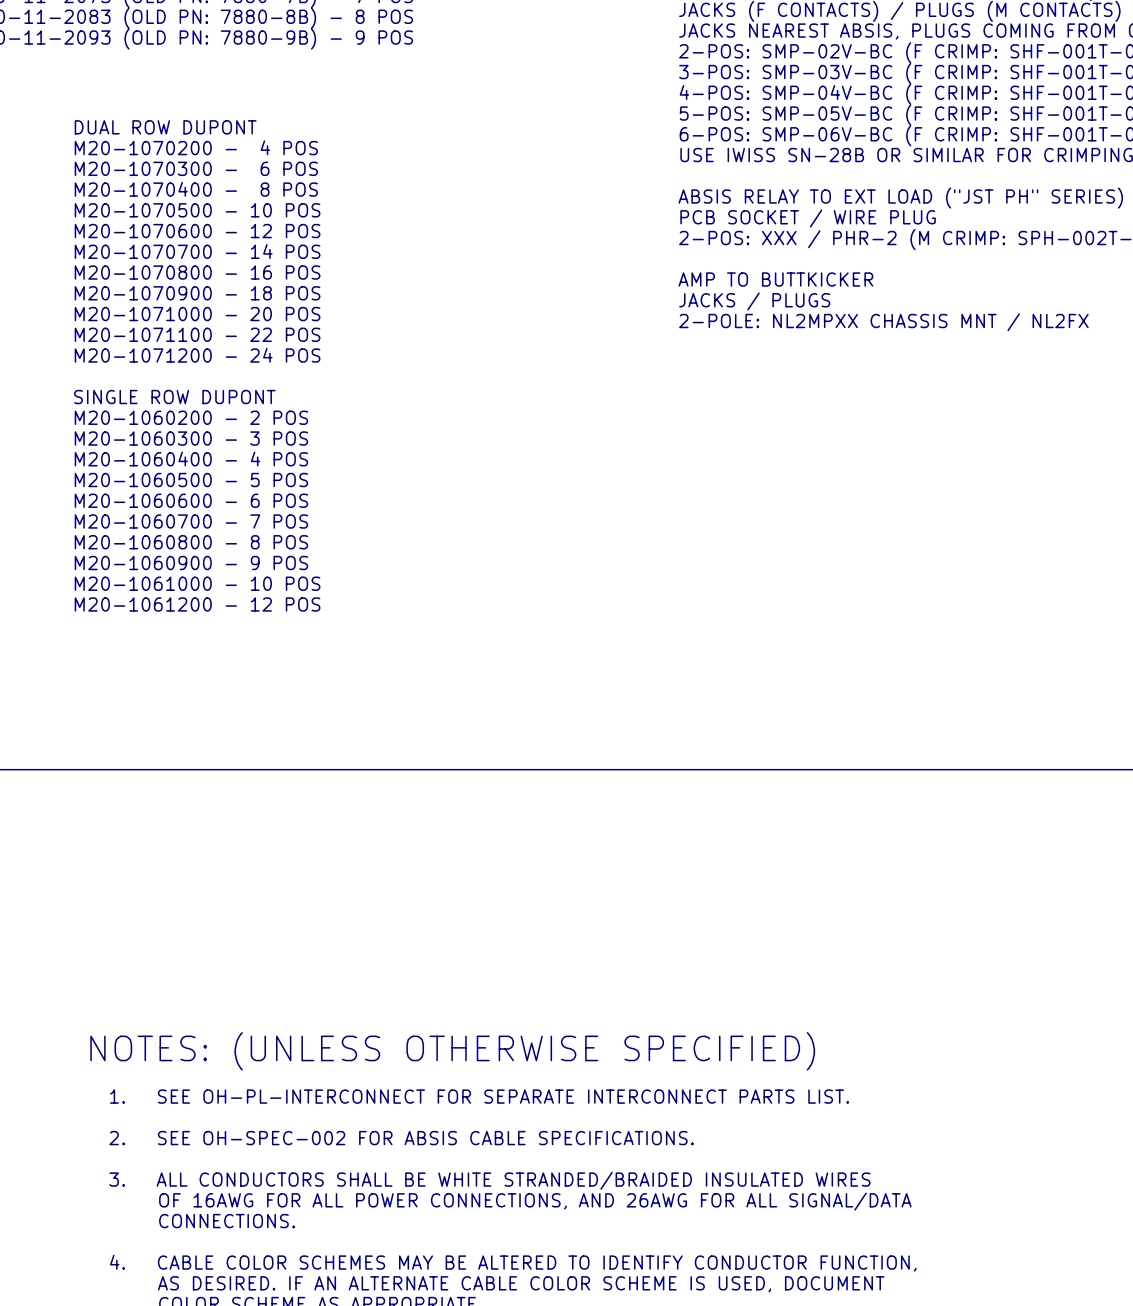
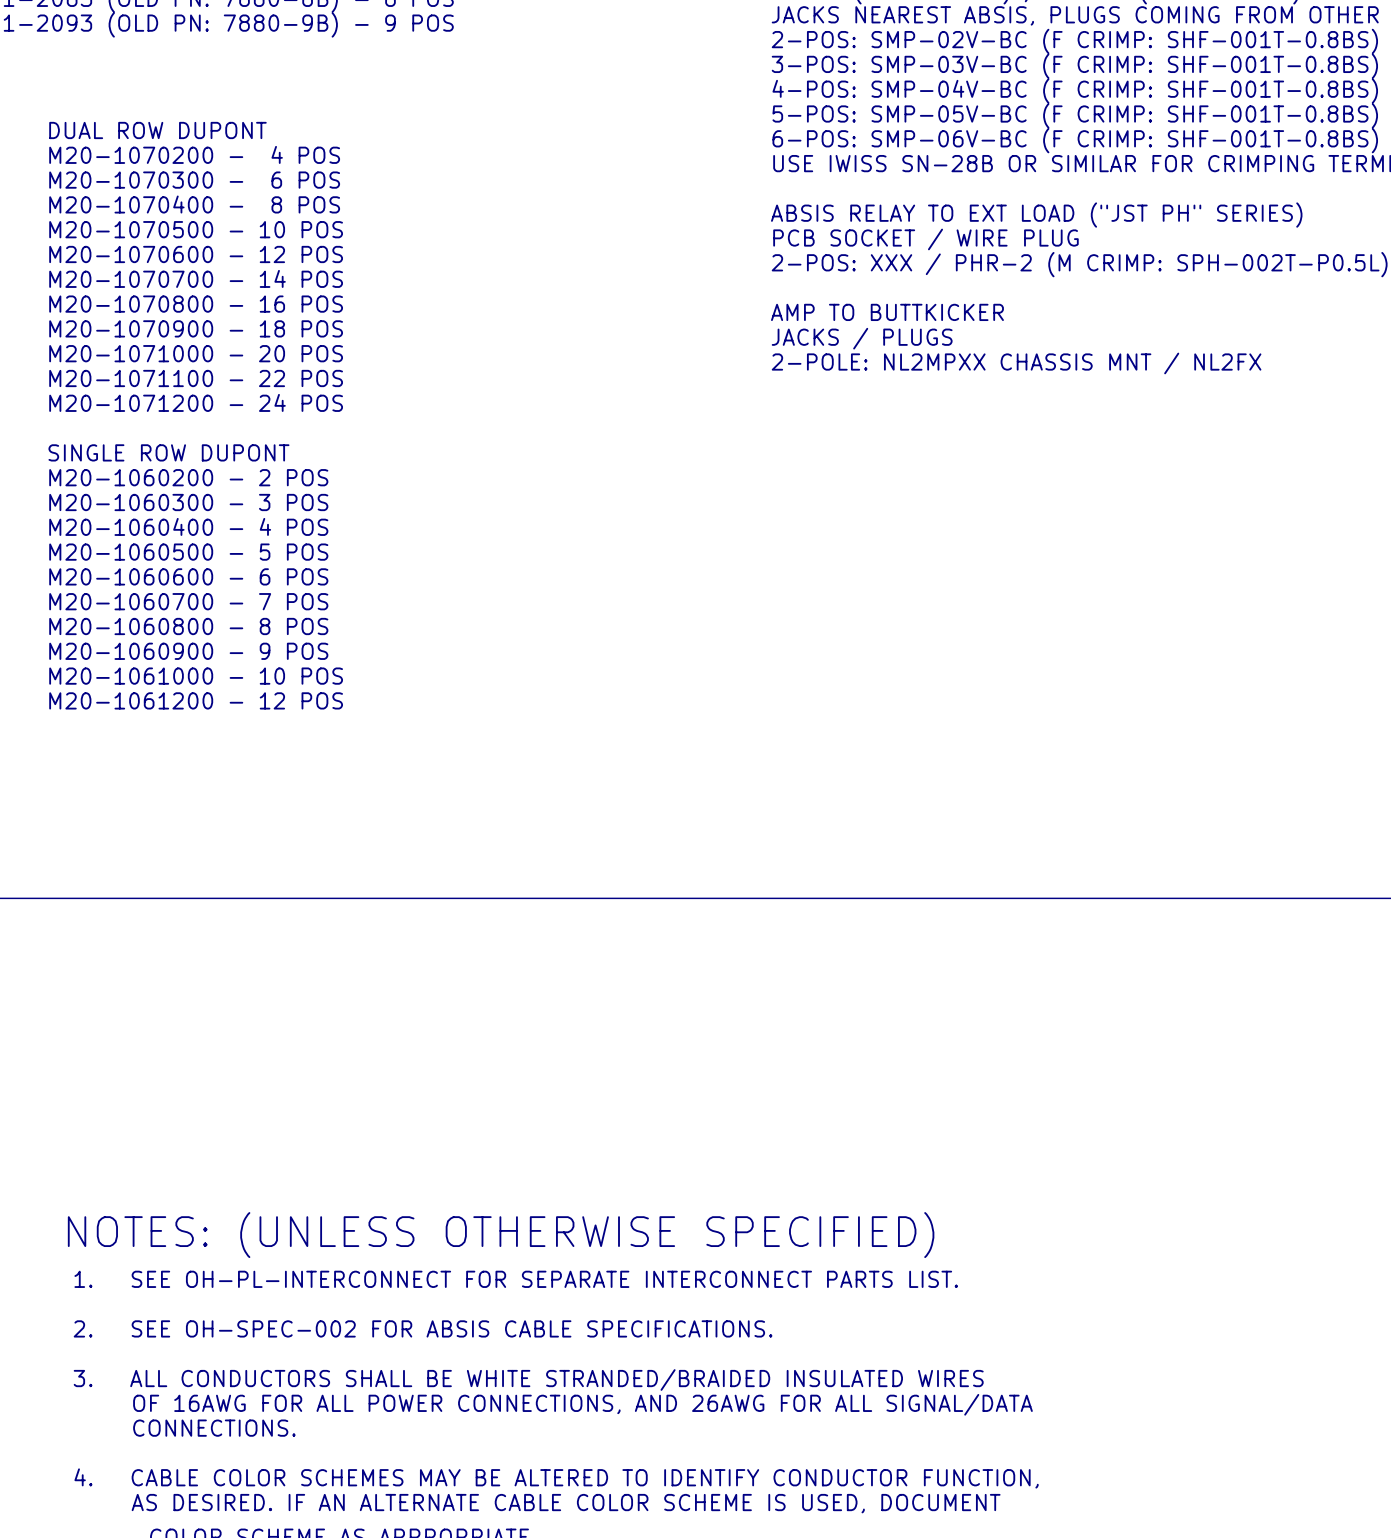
text position: 1. SEE OH-PL-INTERCONNECT FOR SEPARATE INTERCONNECT PARTS LIST. (479, 1096) -> 1. SEE OH-PL-INTERCONNECT FOR SEPARATE INTERCONNECT PARTS LIST. (516, 1279)
text position: 2. SEE OH-SPEC-002 FOR ABSIS CABLE SPECIFICATIONS. (401, 1138) -> 2. SEE OH-SPEC-002 FOR ABSIS CABLE SPECIFICATIONS. (423, 1328)
text position: 3. ALL CONDUCTORS SHALL BE WHITE STRANDED/BRAIDED INSULATED WIRES (489, 1180) -> 3. ALL CONDUCTORS SHALL BE WHITE STRANDED/BRAIDED INSULATED WIRES (528, 1379)
text position: OF 16AWG FOR ALL POWER CONNECTIONS, AND 26AWG FOR ALL SIGNAL/DATA (535, 1201) -> OF 16AWG FOR ALL POWER CONNECTIONS, AND 26AWG FOR ALL SIGNAL/DATA (582, 1404)
text position: CONNECTIONS. (227, 1221) -> CONNECTIONS. (214, 1428)
text position: 4. CABLE COLOR SCHEMES MAY BE ALTERED TO IDENTIFY CONDUCTOR FUNCTION, (513, 1263) -> 4. CABLE COLOR SCHEMES MAY BE ALTERED TO IDENTIFY CONDUCTOR FUNCTION, (556, 1478)
text position: AS DESIRED. IF AN ALTERNATE CABLE COLOR SCHEME IS USED, DOCUMENT (521, 1284) -> AS DESIRED. IF AN ALTERNATE CABLE COLOR SCHEME IS USED, DOCUMENT (566, 1503)

